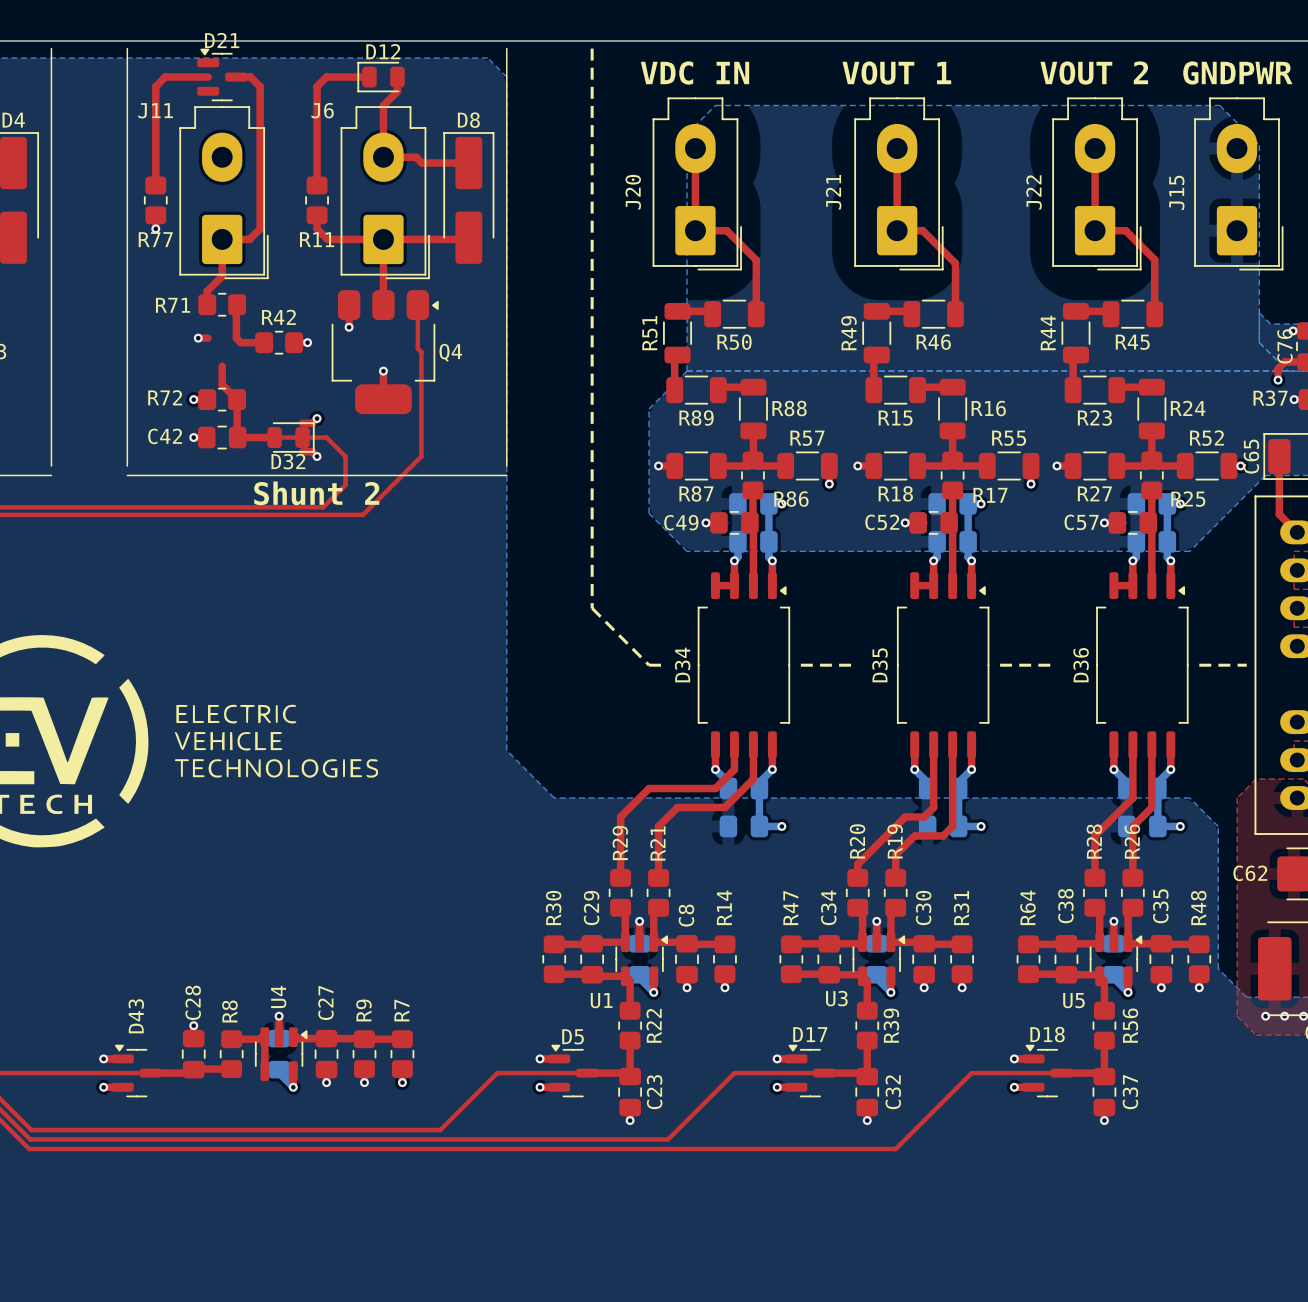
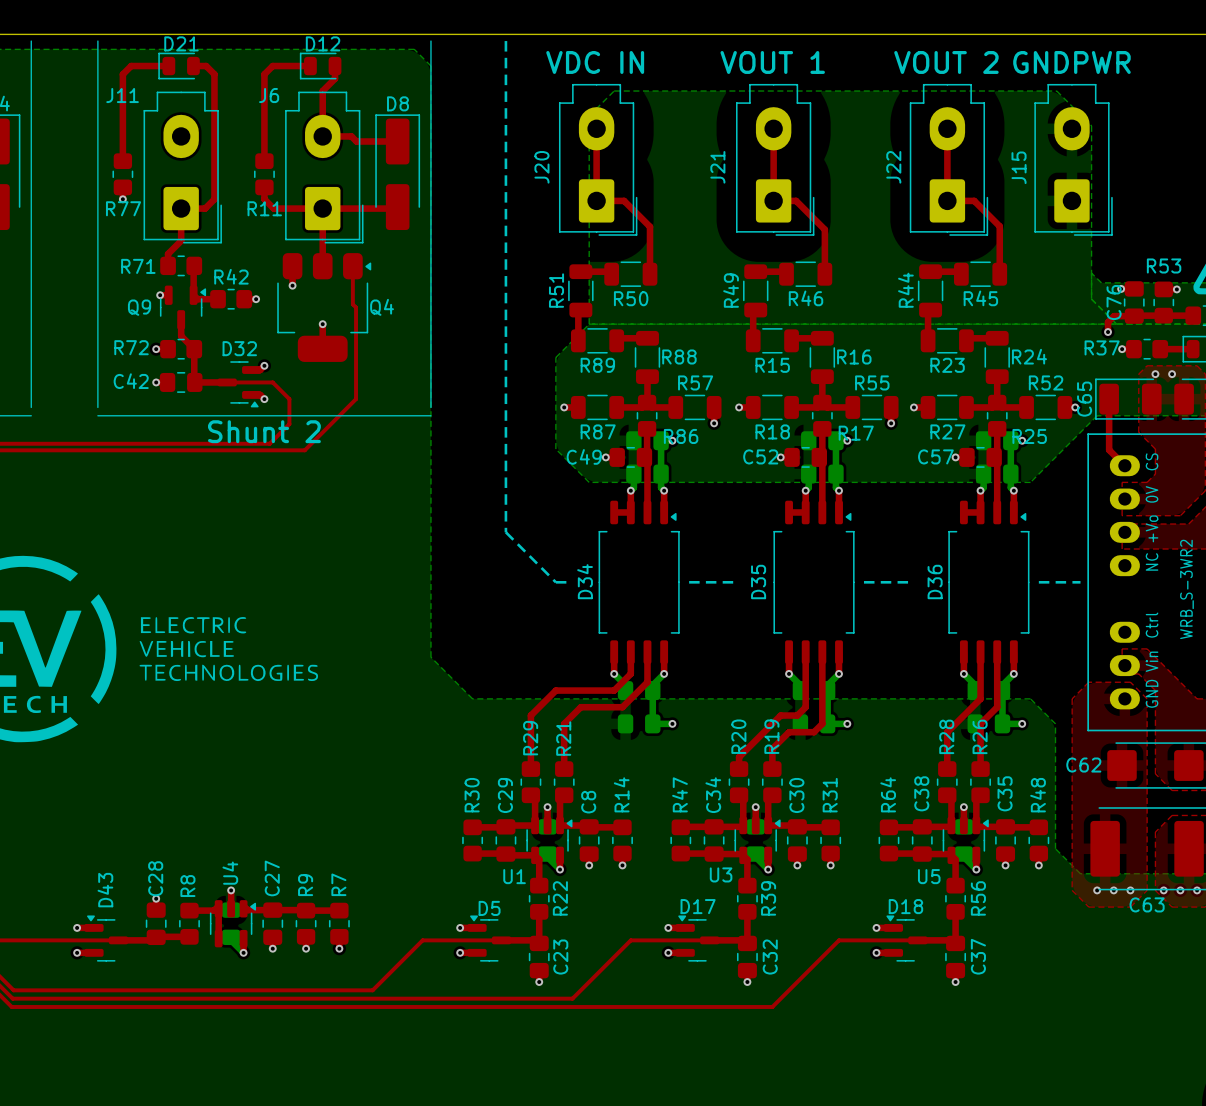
D21 footprint: [197, 48, 248, 102] -> [158, 52, 200, 80]
Q9: none -> (183, 307)
D32 footprint: [267, 422, 315, 453] -> [217, 361, 262, 408]
D32 name position: D32 (288, 461) -> D32 (239, 348)

